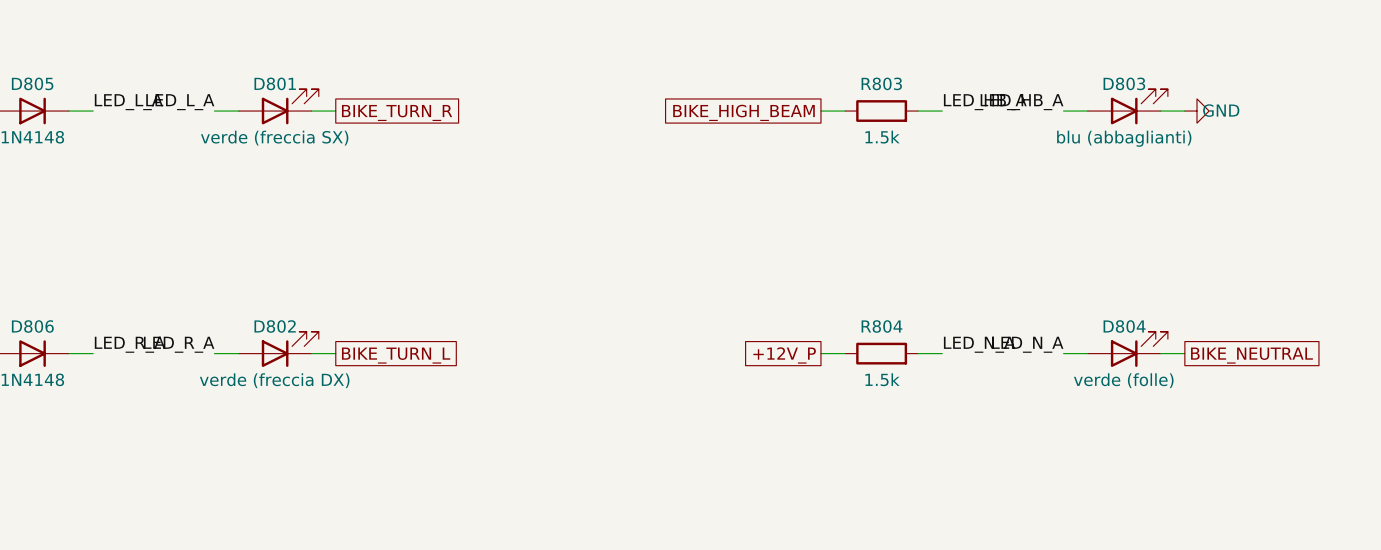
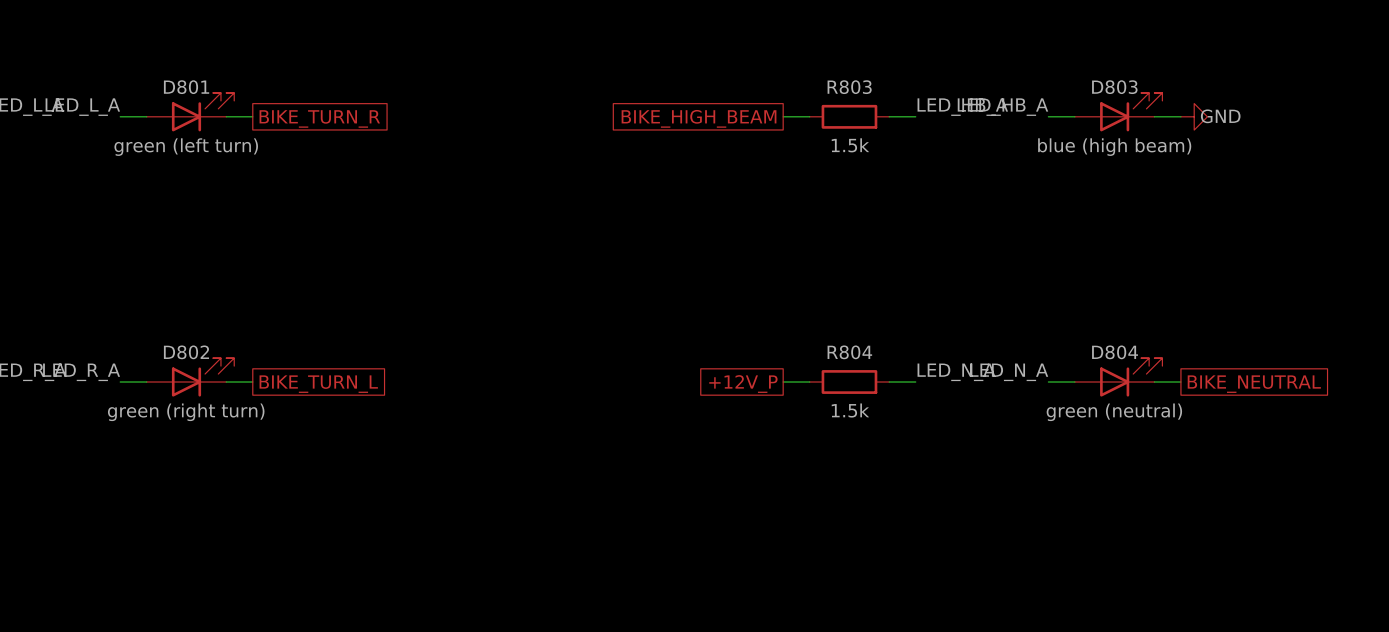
D801 value: verde (freccia SX) (274, 138) -> green (left turn) (186, 147)
D803 value: blu (abbaglianti) (1124, 138) -> blue (high beam) (1114, 147)
D802 value: verde (freccia DX) (274, 380) -> green (right turn) (186, 412)
D804 value: verde (folle) (1123, 380) -> green (neutral) (1114, 412)

